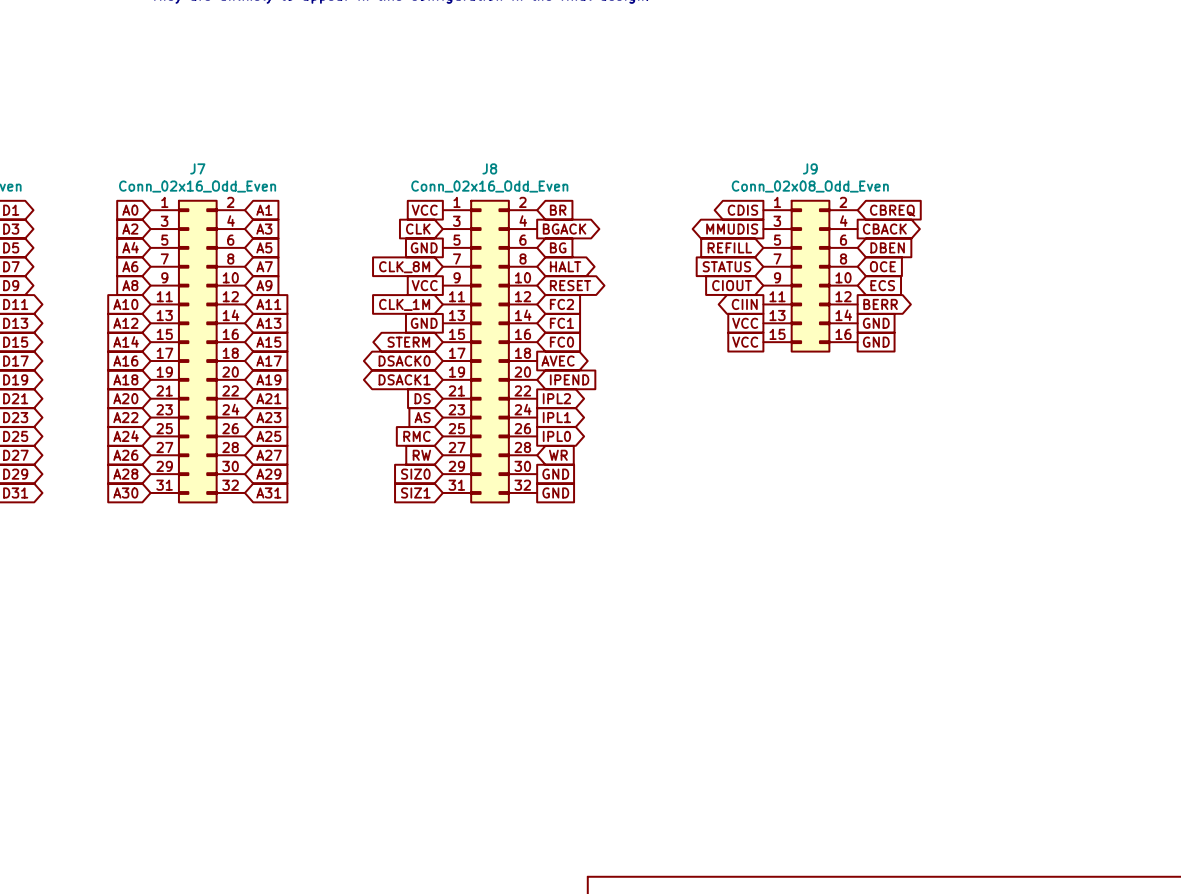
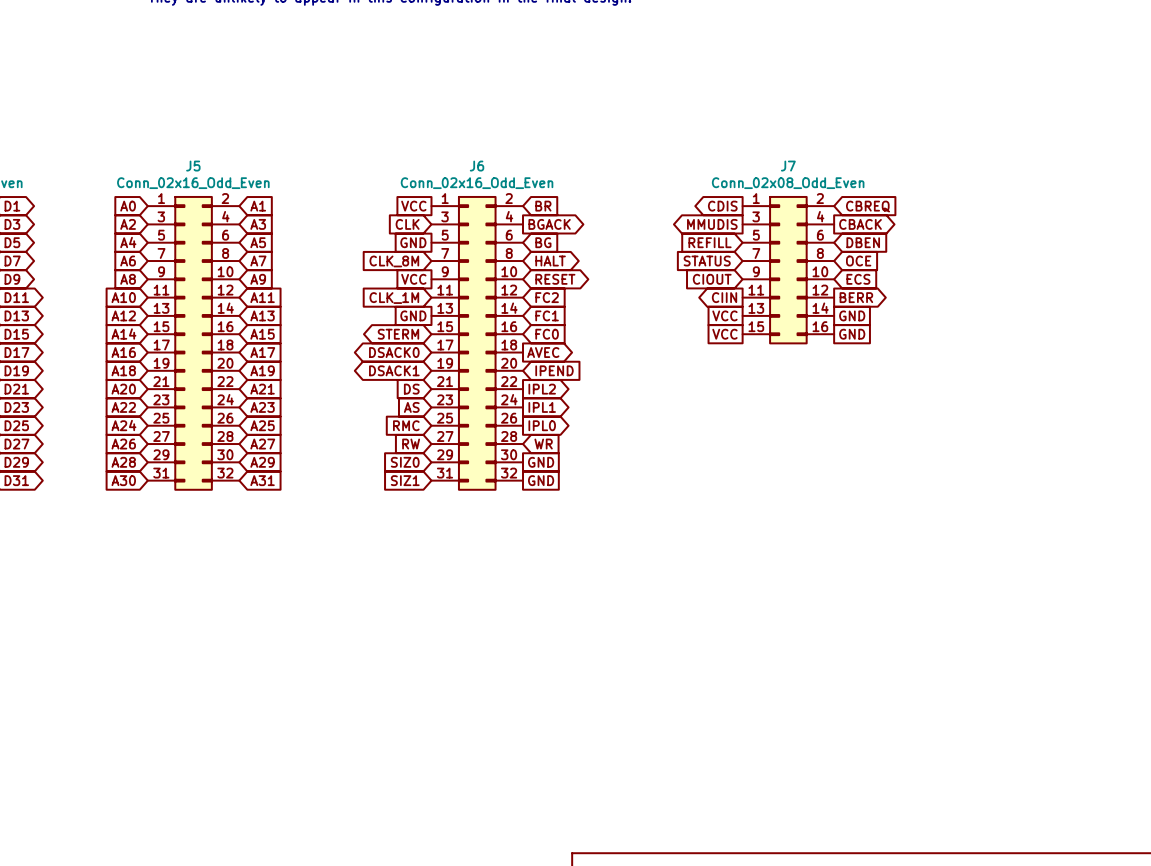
J7 name: J7 (197, 168) -> J5 (193, 166)
J8 name: J8 (489, 168) -> J6 (477, 166)
J9 name: J9 (810, 168) -> J7 (788, 166)

